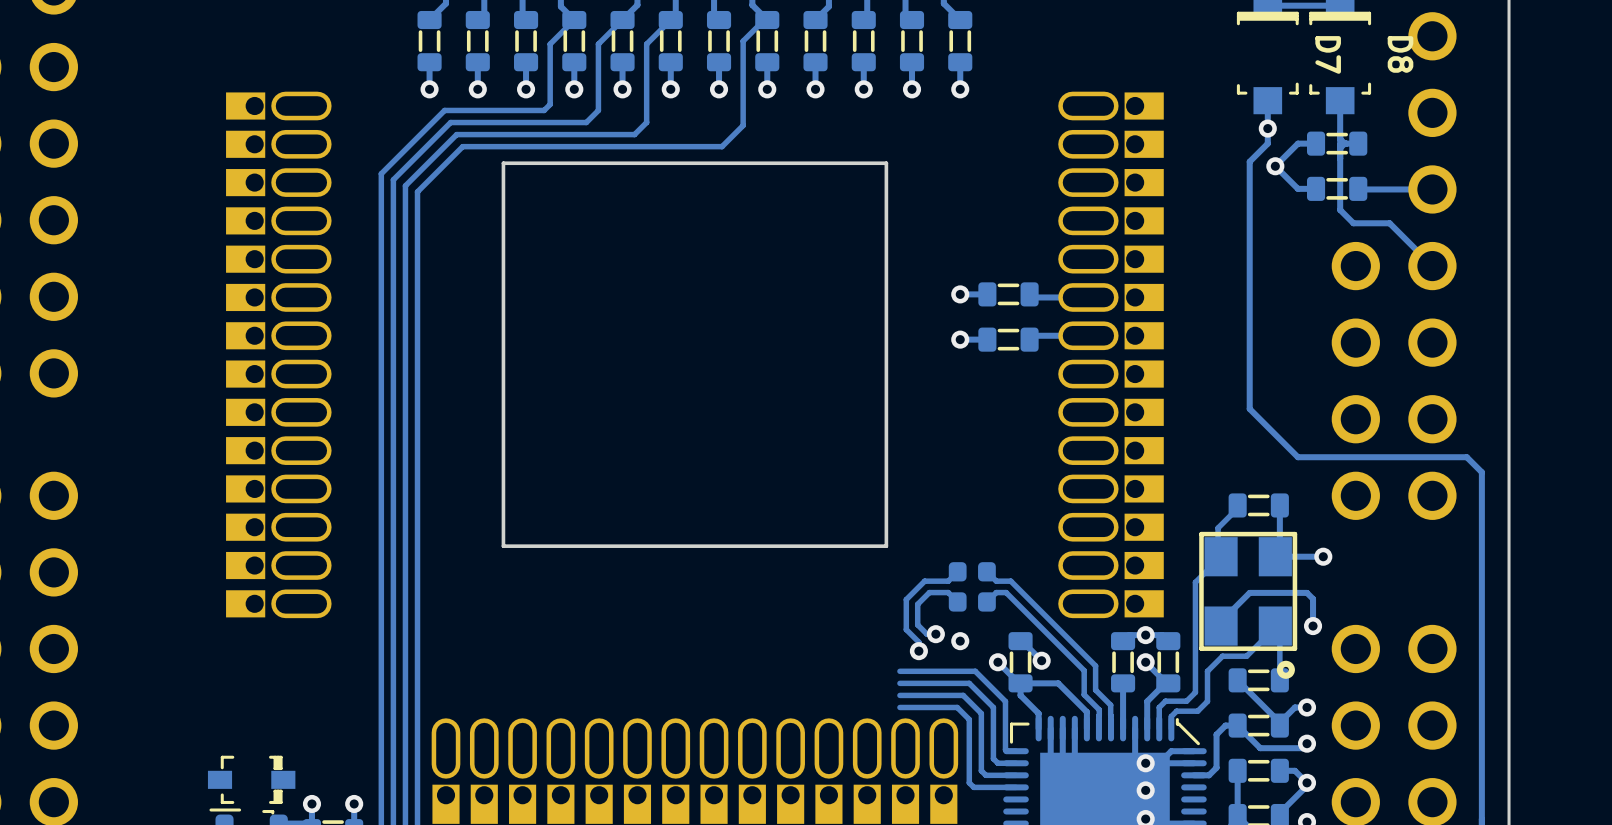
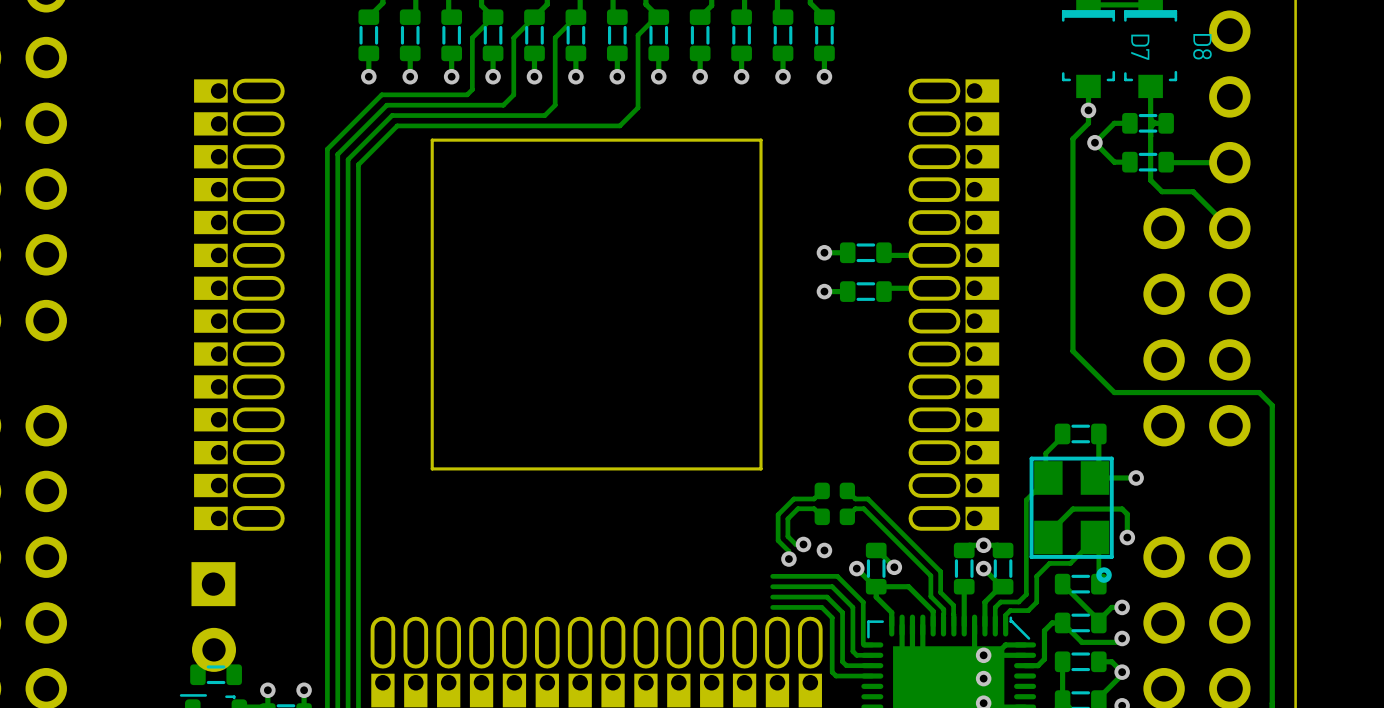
part: none -> (213, 617)
part footprint: [207, 755, 296, 804] -> [190, 664, 242, 686]

